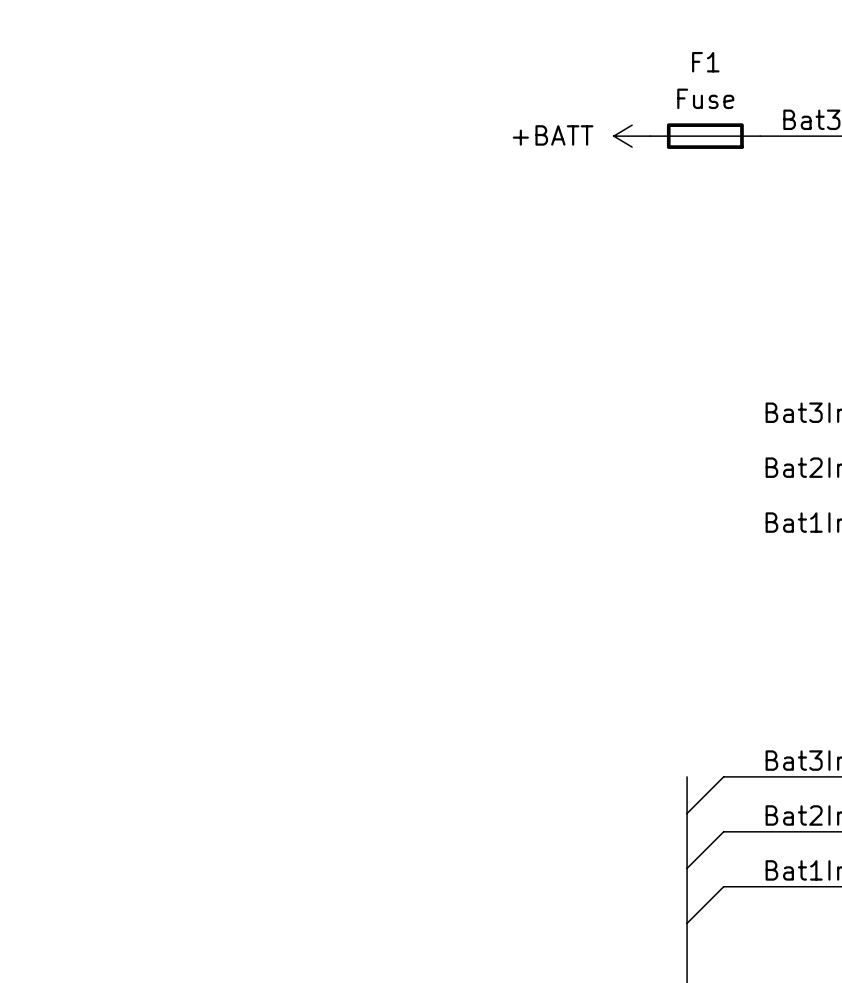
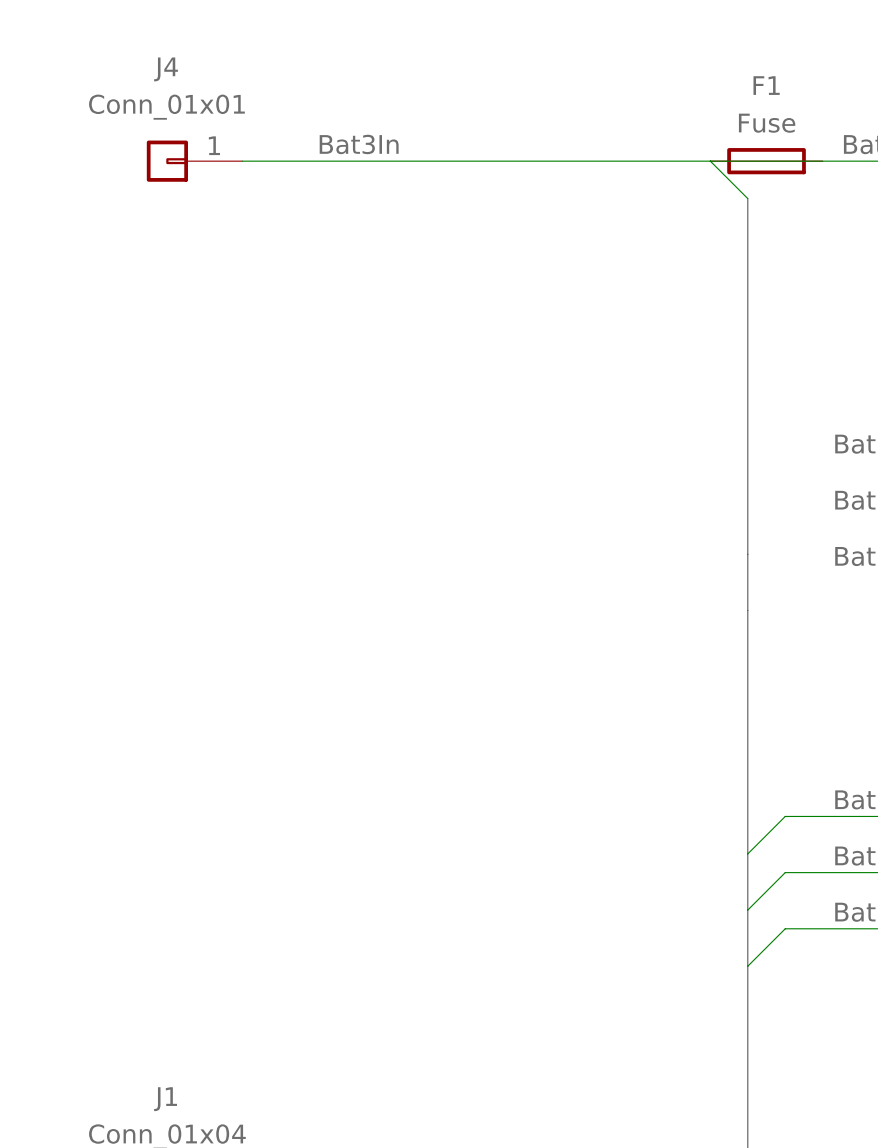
label: none -> Bat3In (359, 144)
J4: none -> Conn_01x01 (194, 161)
wire: none -> (242, 161) (822, 161)
power symbol: +BATT (632, 136) -> none
wire: none -> (710, 161) (747, 198)
bus: none -> (747, 198) (747, 816)

